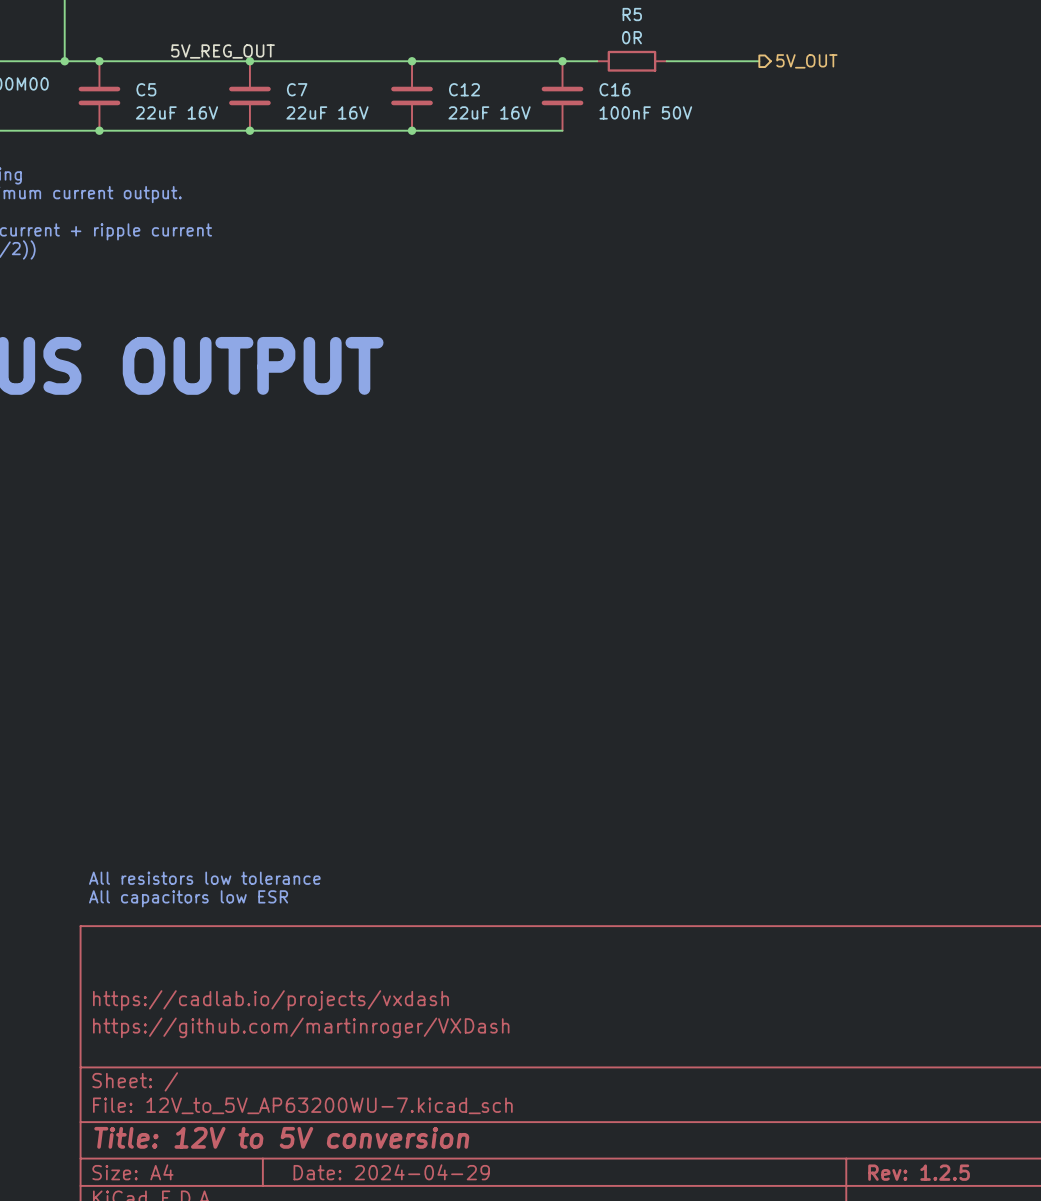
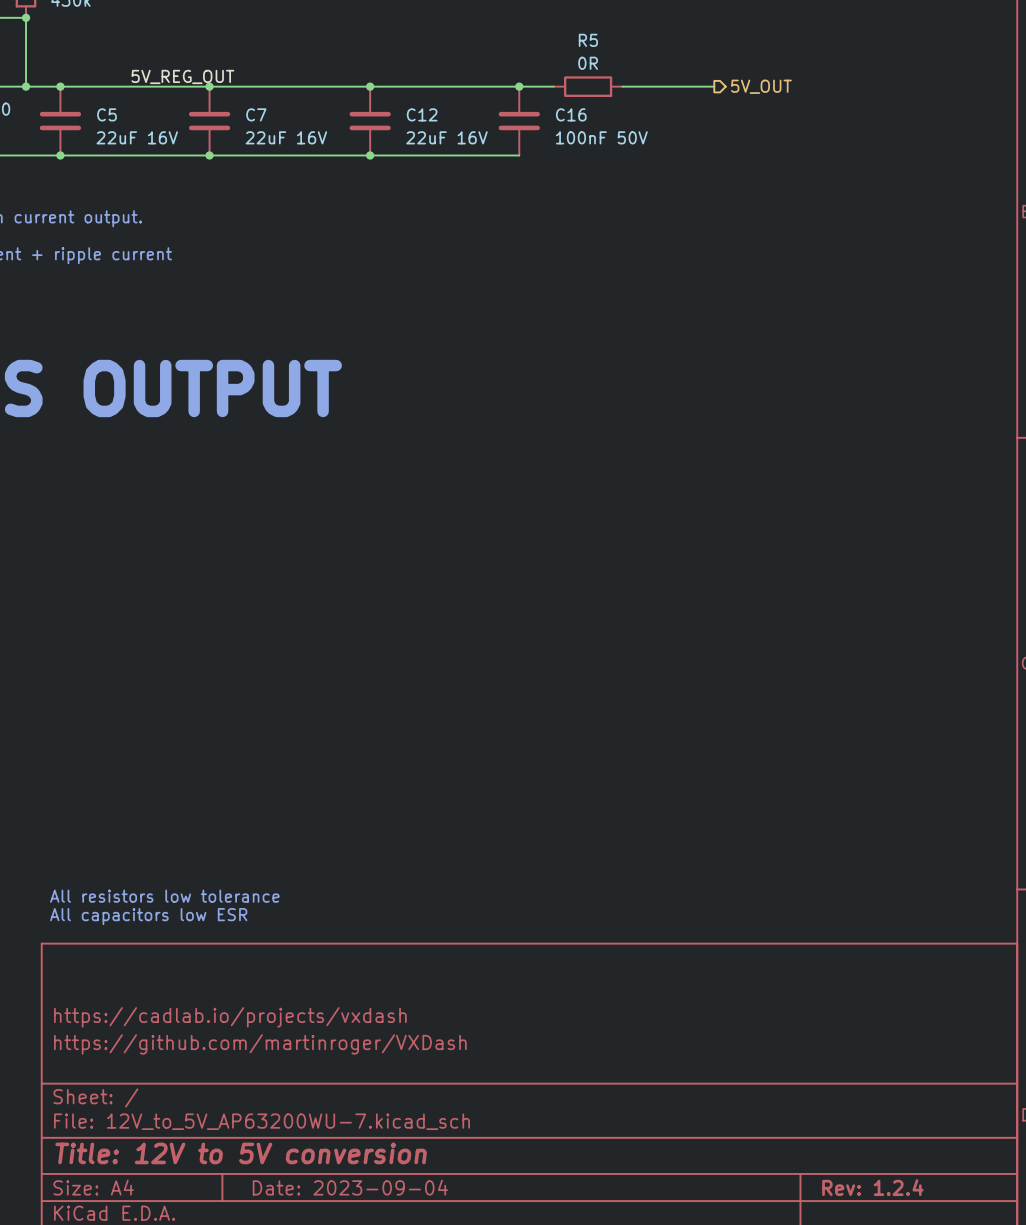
title block: Date: 2024-04-29 (391, 1172) -> Date: 2023-09-04 (350, 1187)
title block: Rev: 1.2.5 (919, 1172) -> Rev: 1.2.4 (872, 1187)

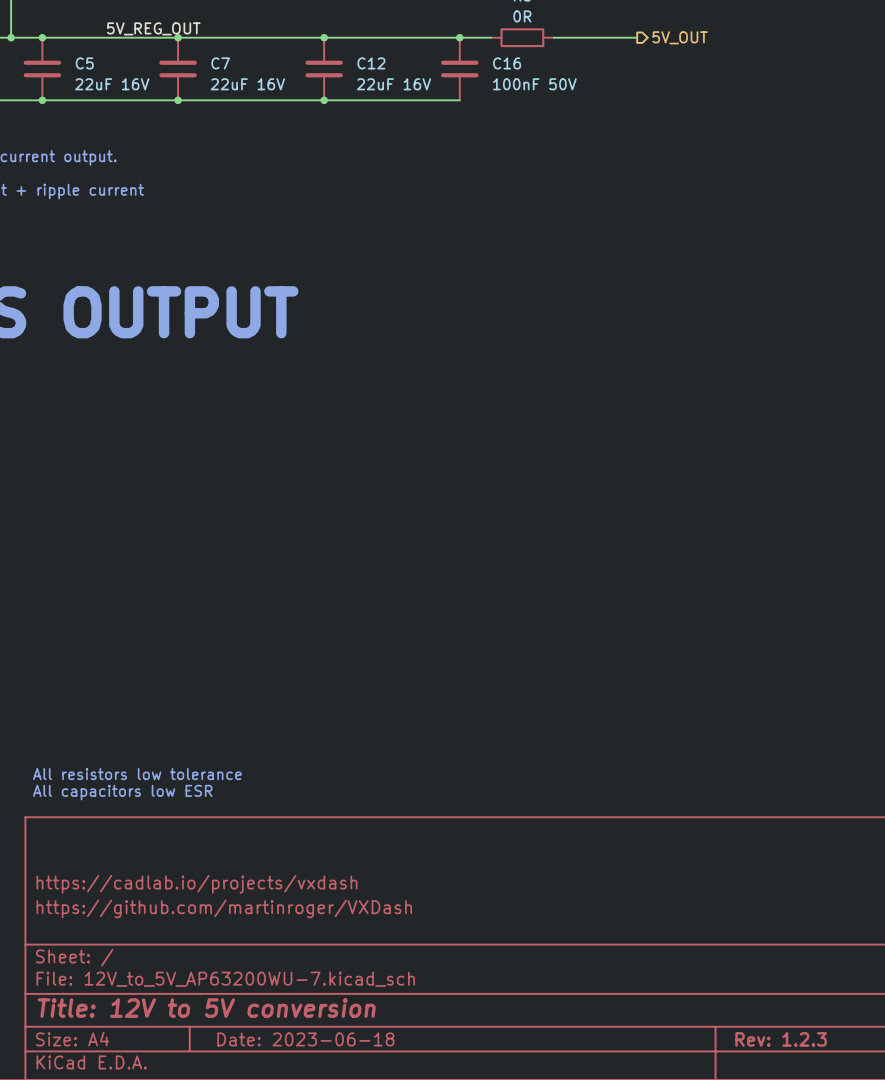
title block: Date: 2023-09-04 (350, 1187) -> Date: 2023-06-18 (305, 1039)
title block: Rev: 1.2.4 (872, 1187) -> Rev: 1.2.3 (781, 1039)

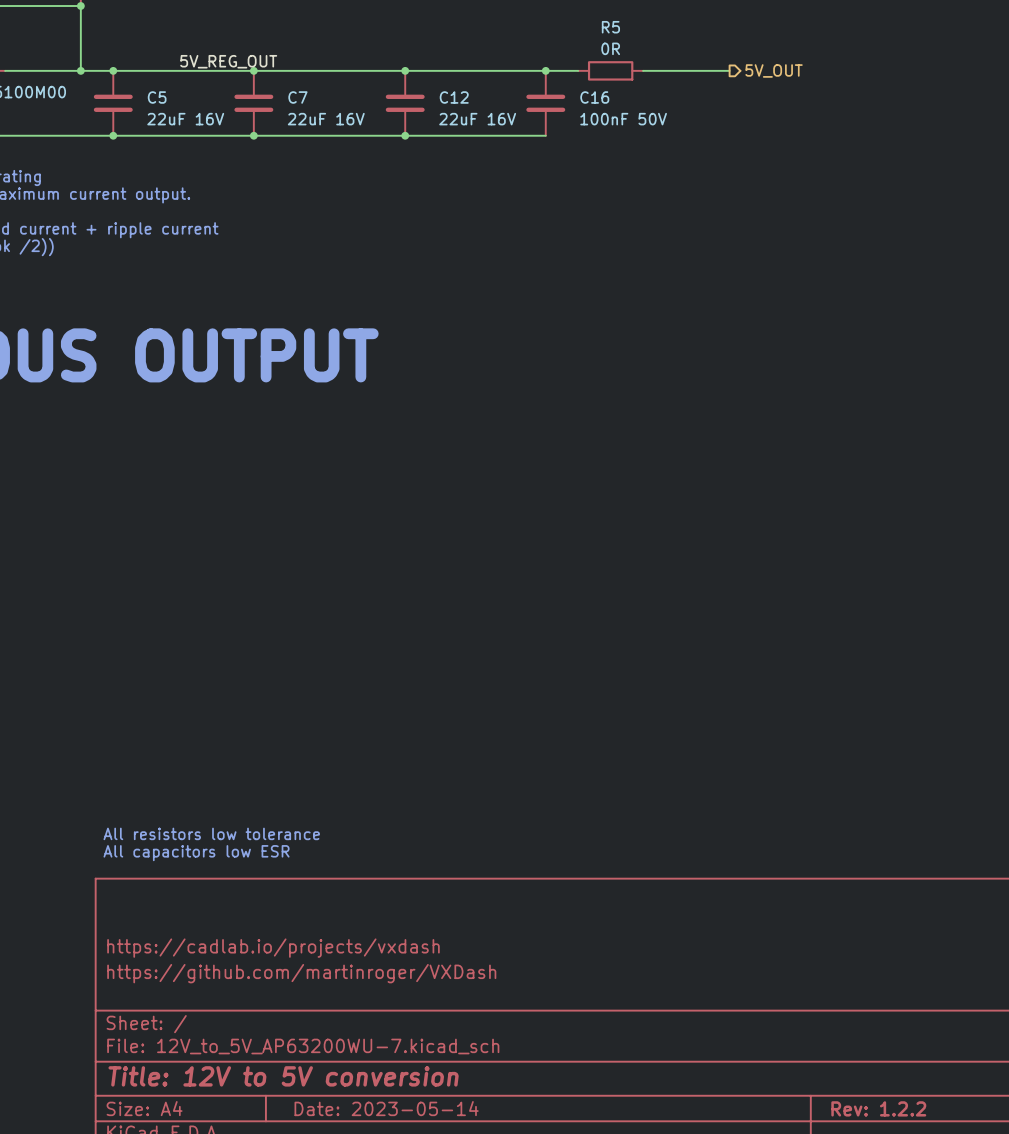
title block: Date: 2023-06-18 (305, 1039) -> Date: 2023-05-14 (386, 1108)
title block: Rev: 1.2.3 (781, 1039) -> Rev: 1.2.2 (878, 1108)

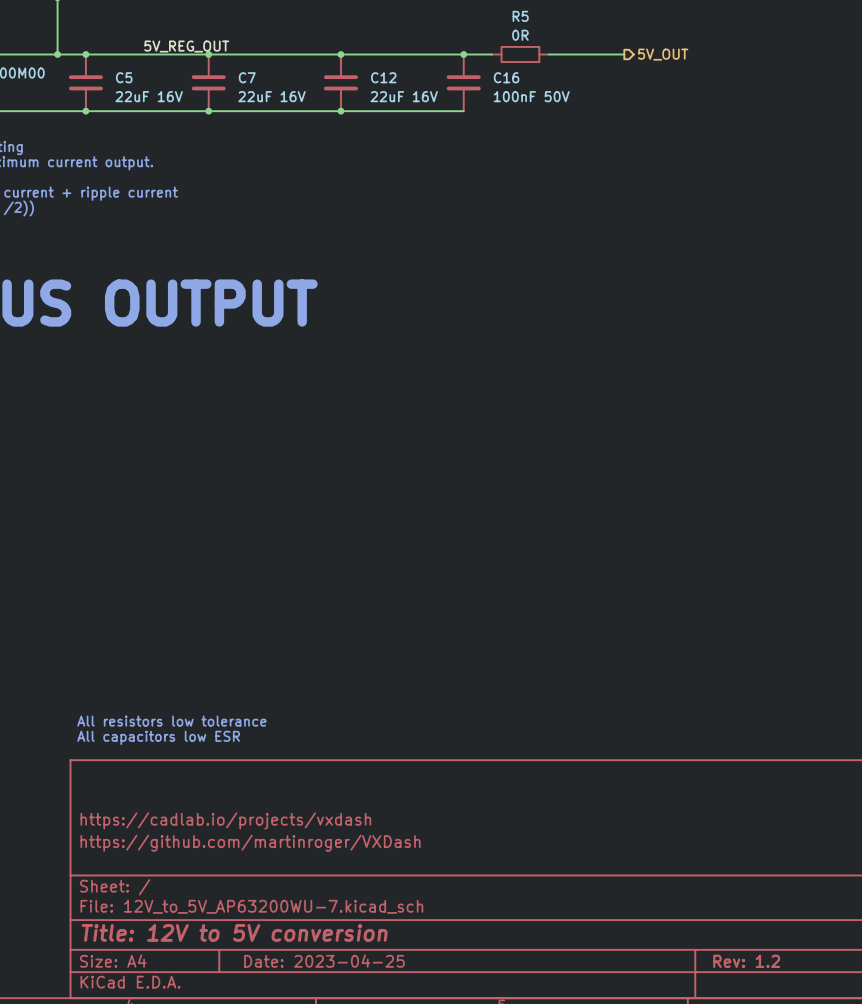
title block: Date: 2023-05-14 (386, 1108) -> Date: 2023-04-25 (324, 961)
title block: Rev: 1.2.2 (878, 1108) -> Rev: 1.2 (746, 961)

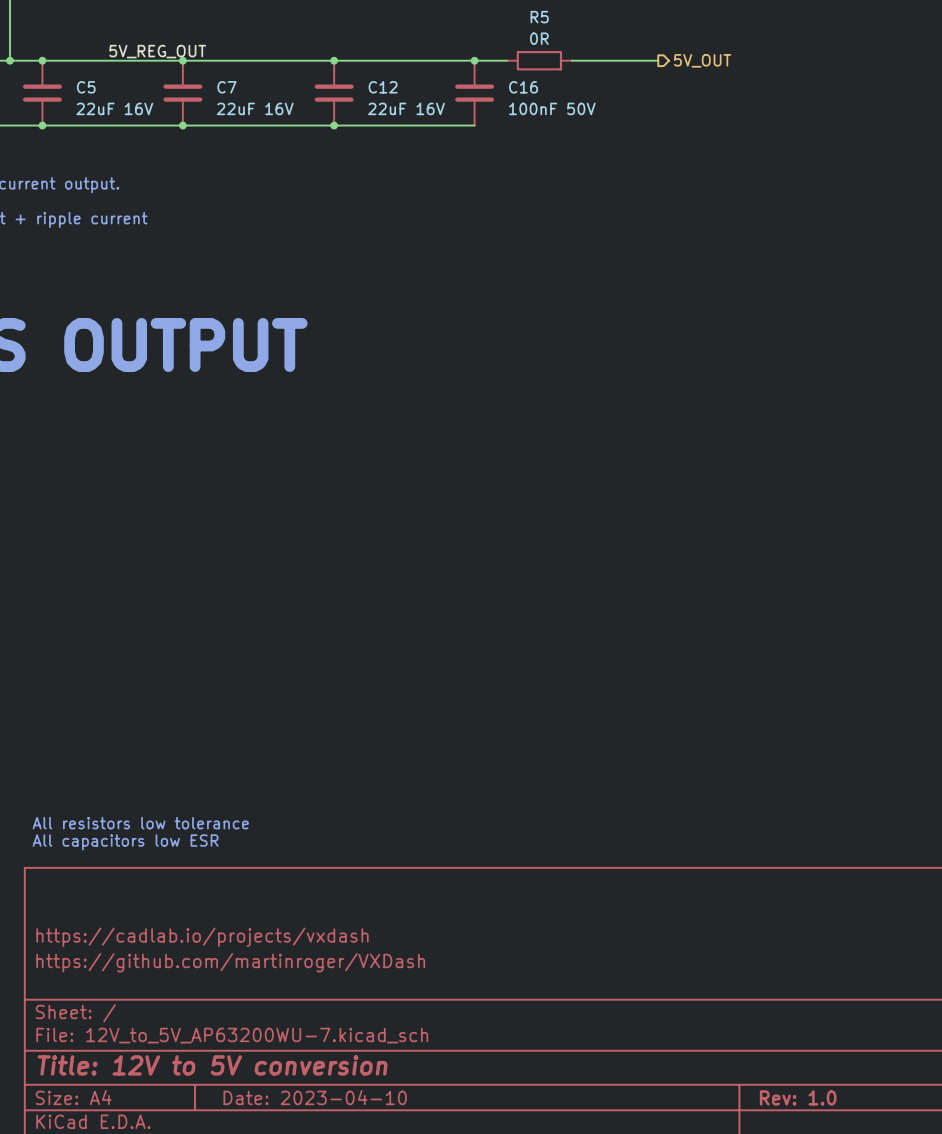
title block: Date: 2023-04-25 (324, 961) -> Date: 2023-04-10 (315, 1097)
title block: Rev: 1.2 (746, 961) -> Rev: 1.0 (798, 1097)

